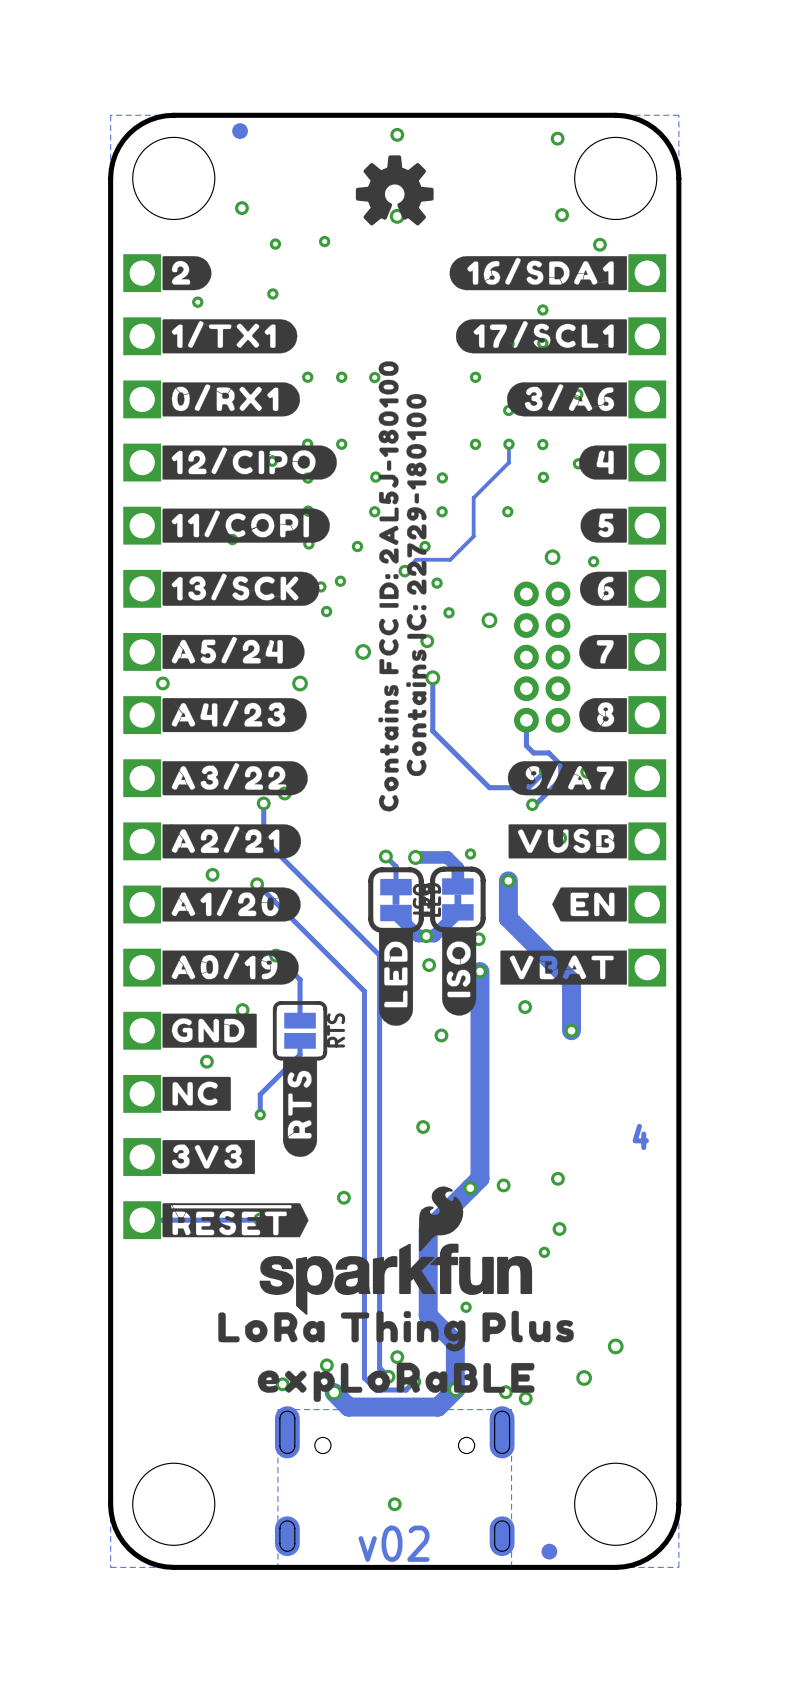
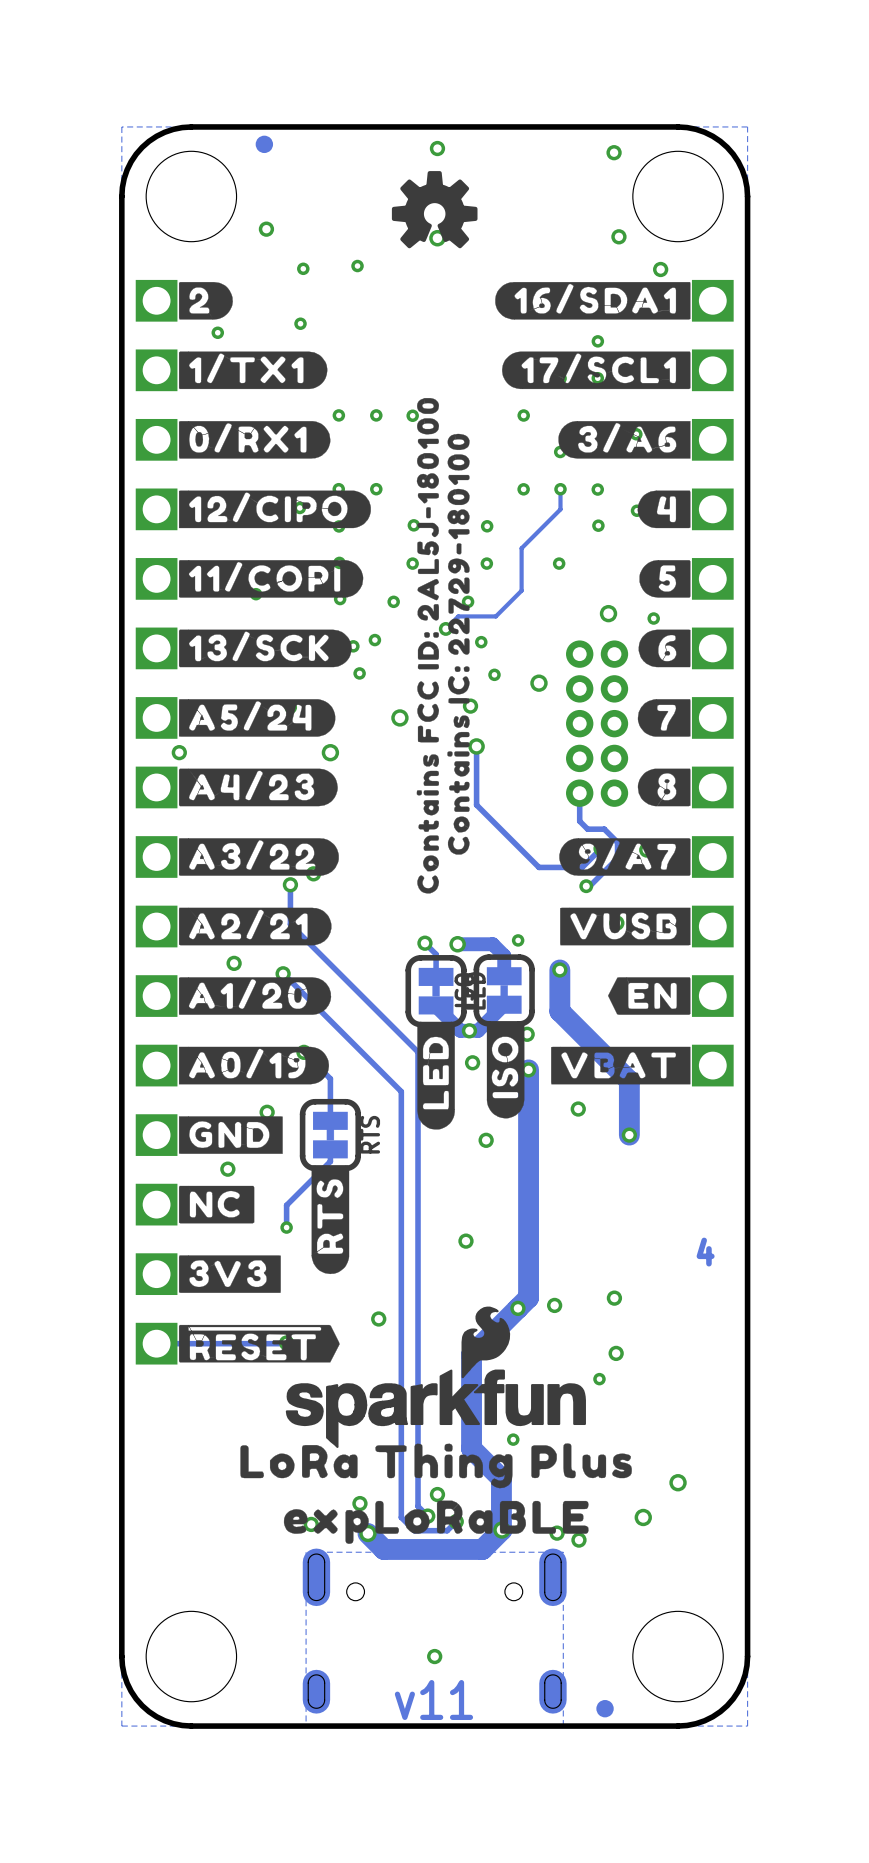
RTS footprint: [272, 1001, 328, 1061] -> [299, 1098, 362, 1172]
text: v02 (394, 1543) -> v11 (433, 1700)

